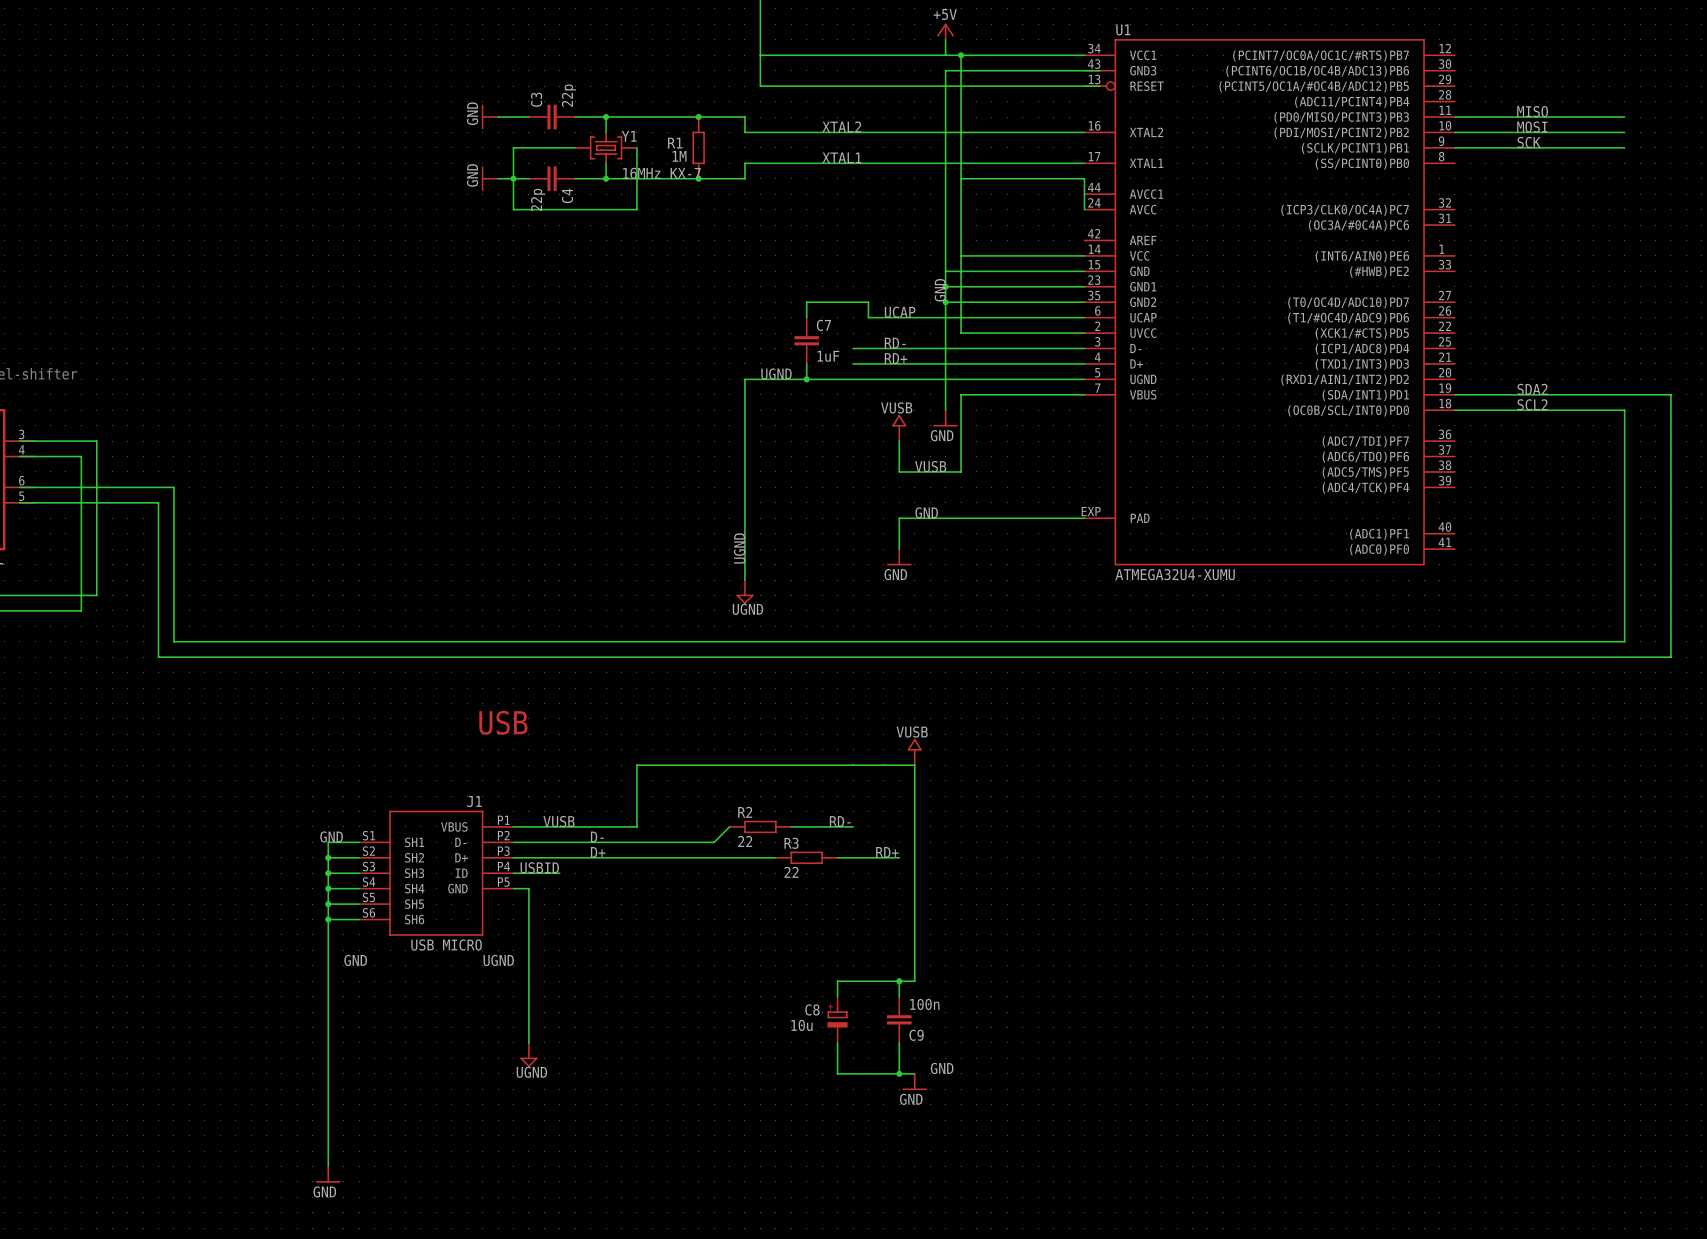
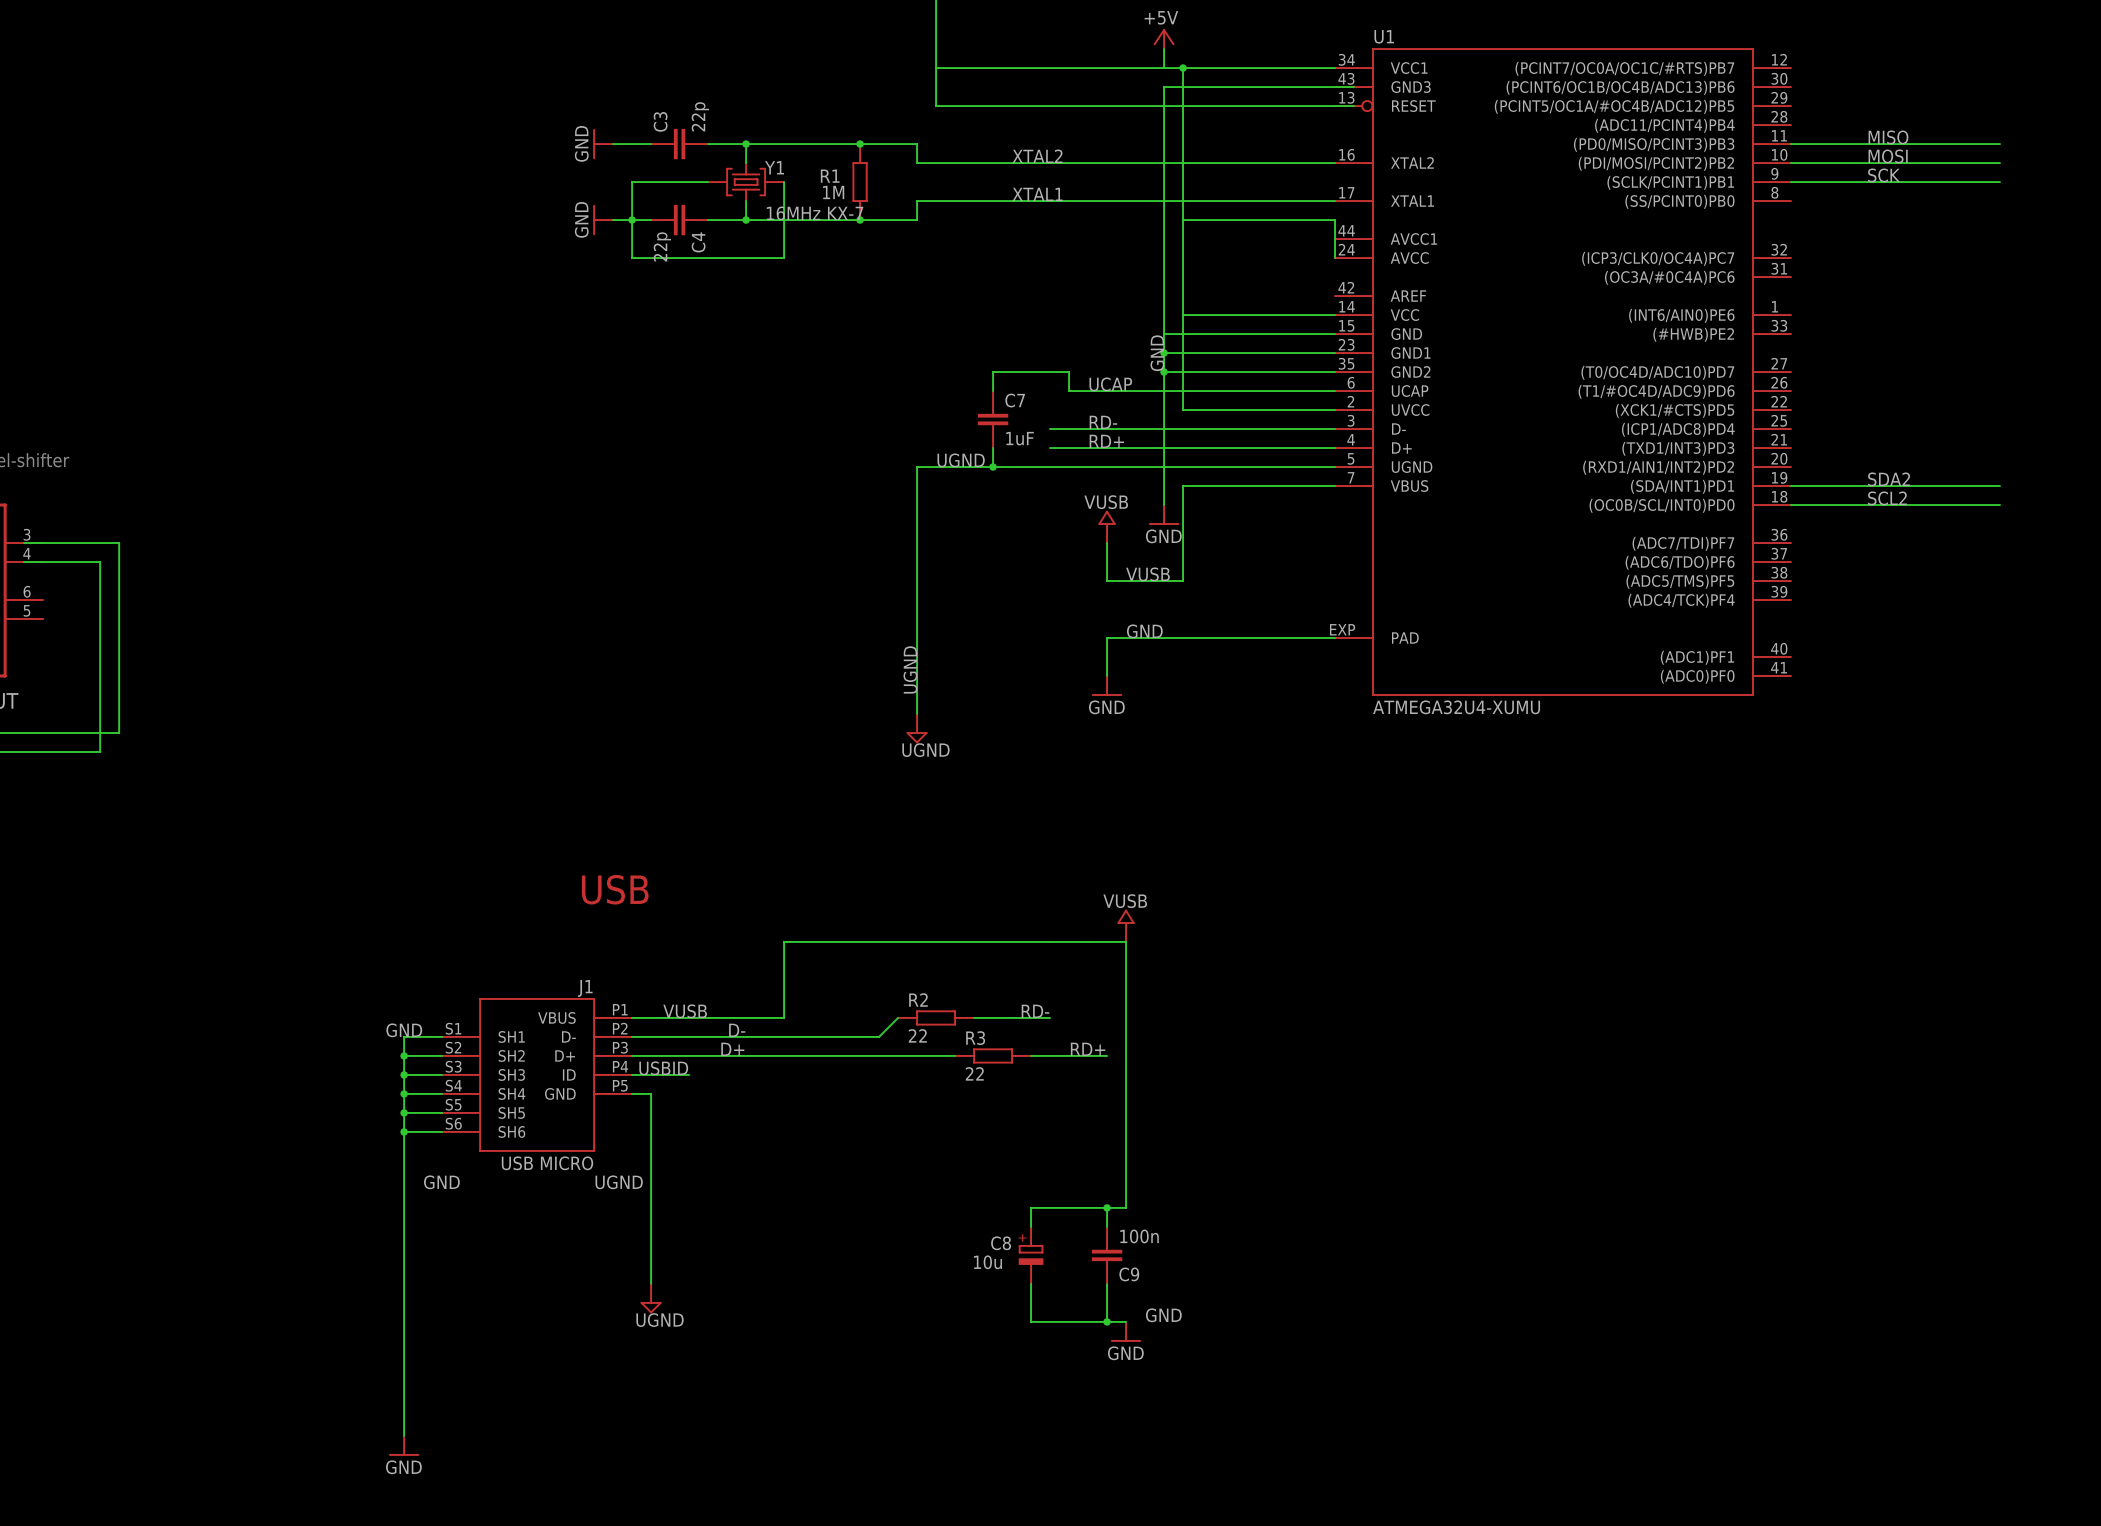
wire: (1624, 394) (1670, 394) (1670, 657) (158, 657) (158, 502) (19, 502) -> none
wire: (1624, 410) (1624, 641) (173, 641) (173, 487) (19, 487) -> none

